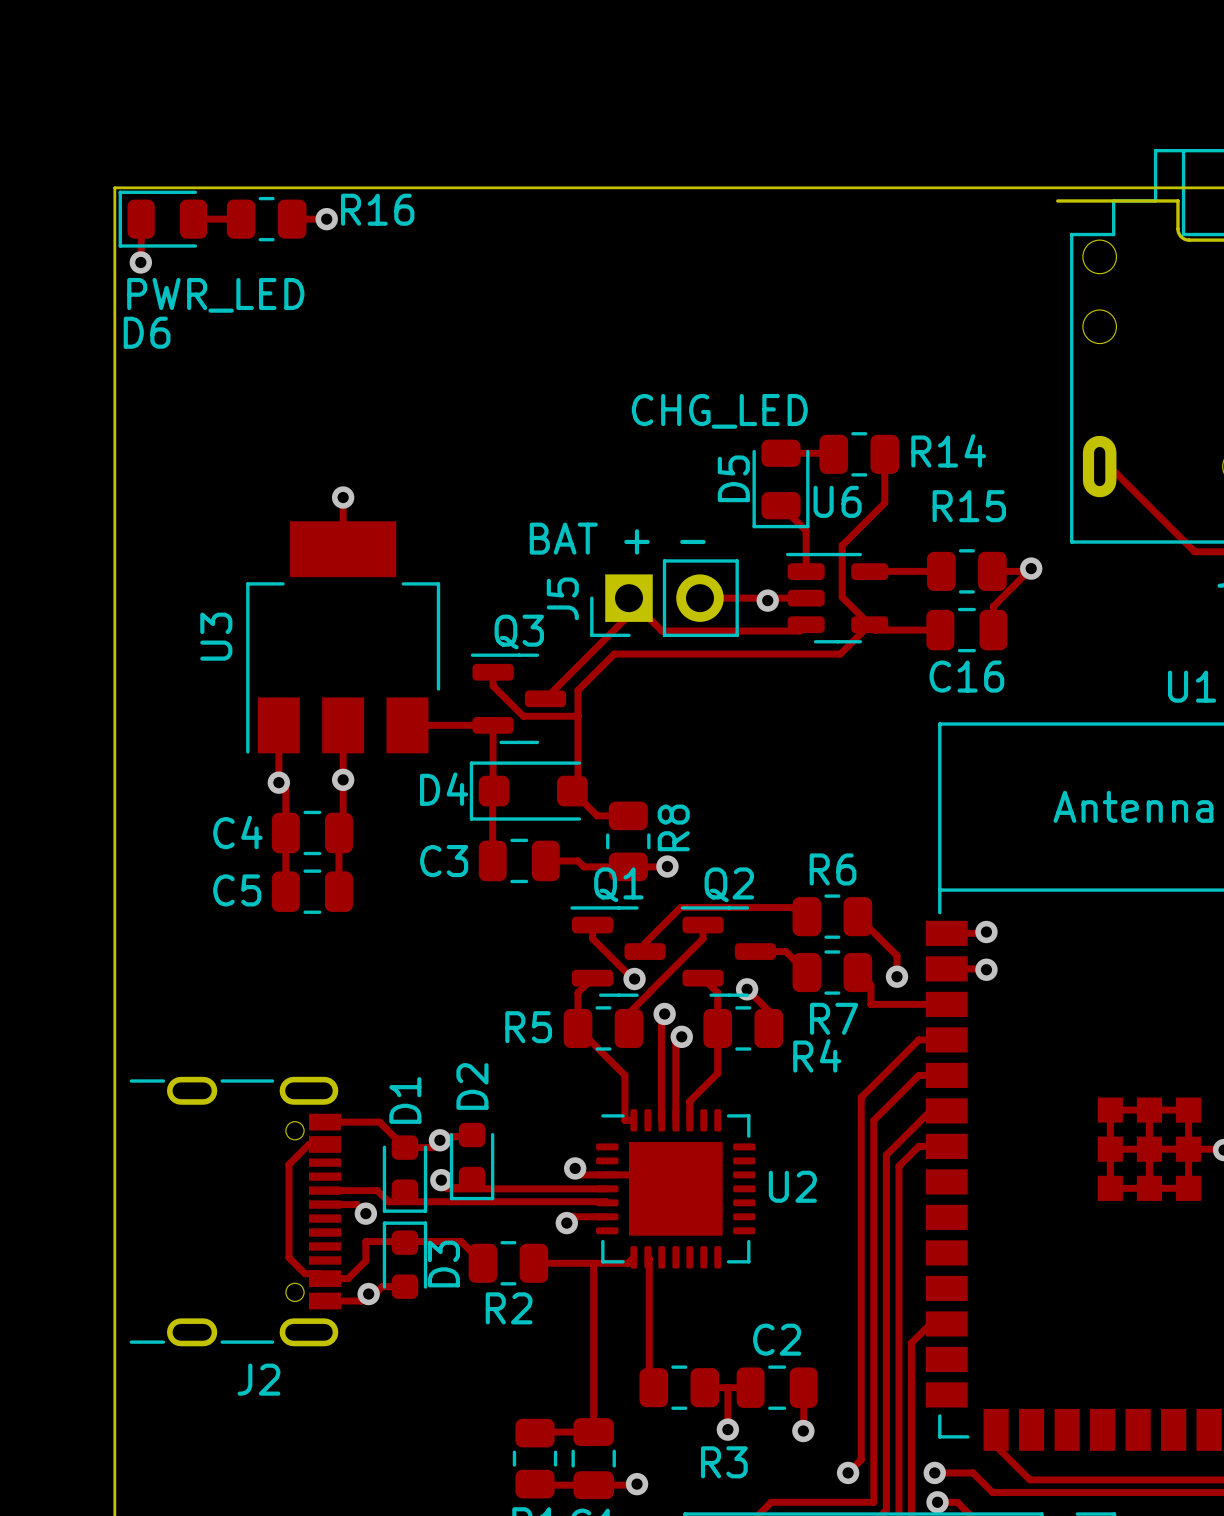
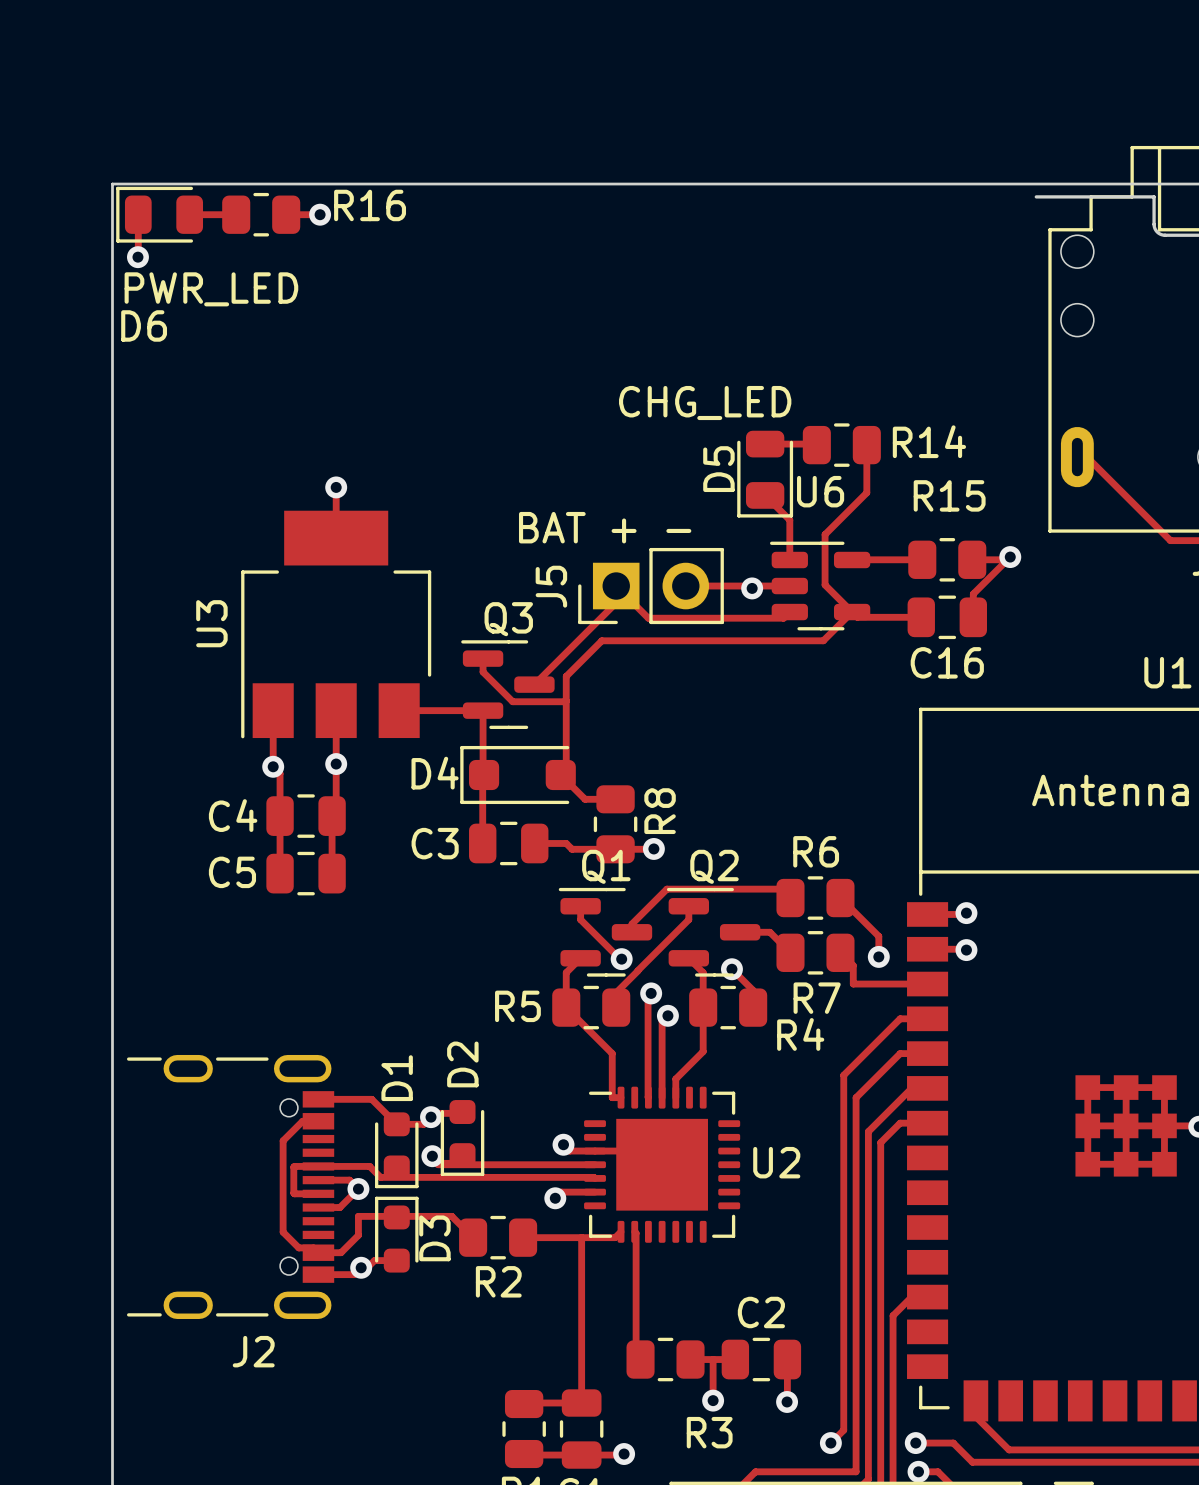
track: none -> (318, 1166) (293, 1167) (293, 1193) (318, 1193)
track: none -> (358, 1189) (339, 1207) (318, 1207)

